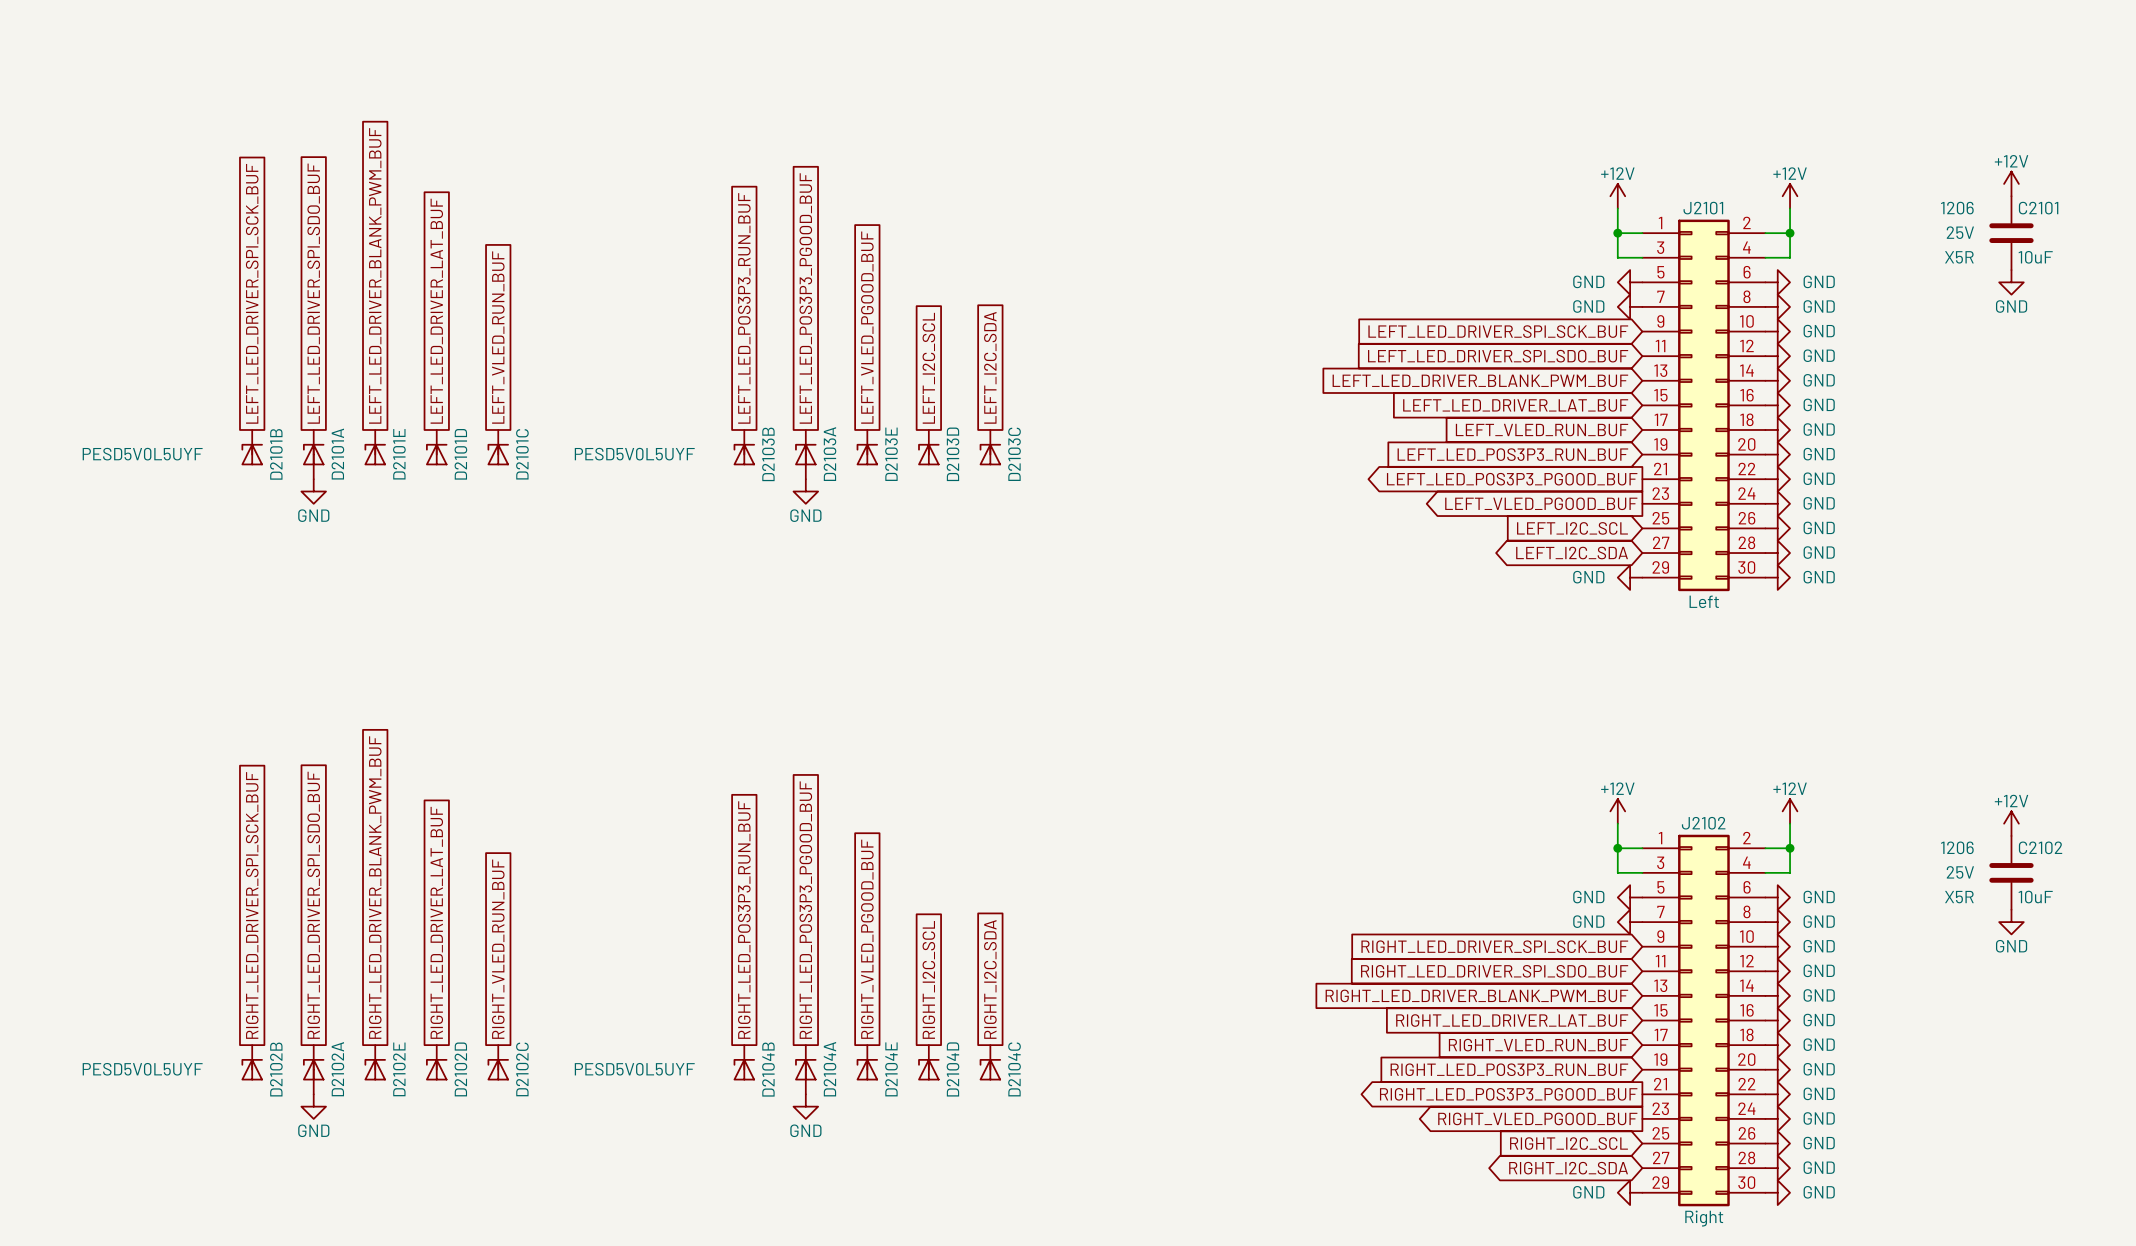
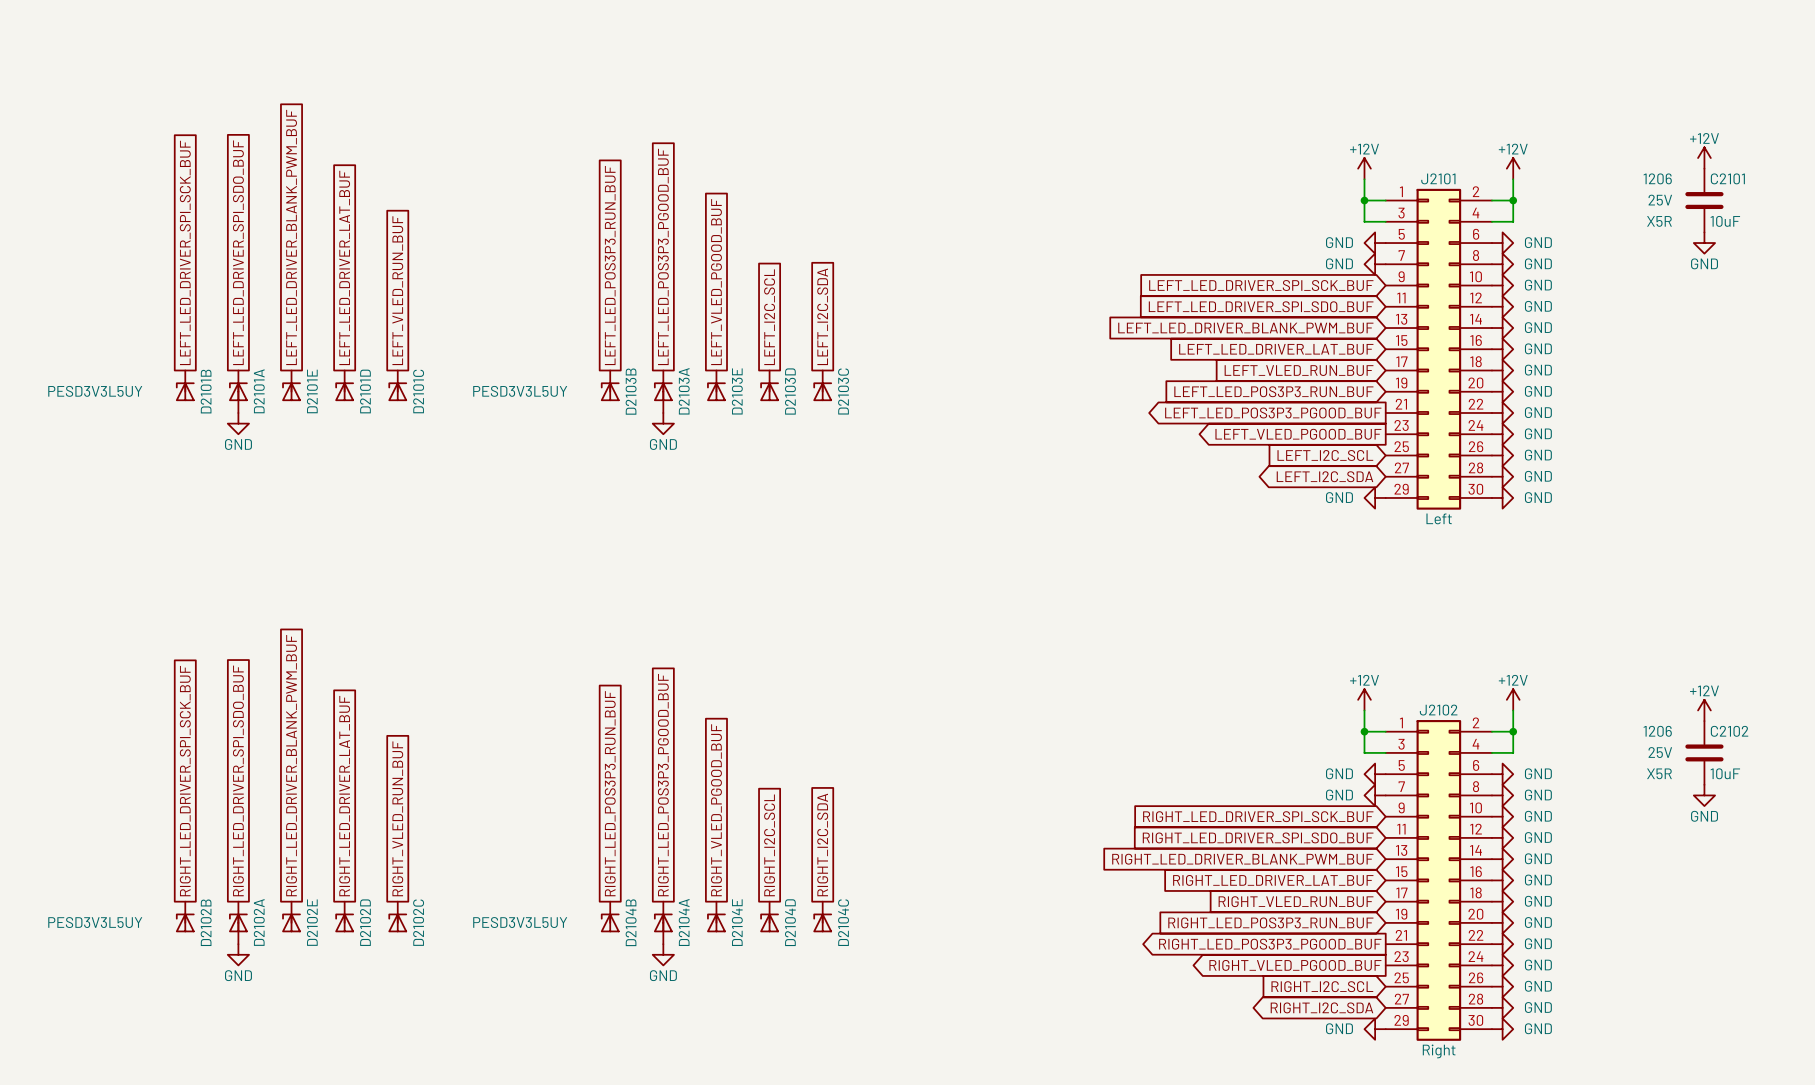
D2101A value: PESD5V0L5UYF (142, 454) -> PESD3V3L5UY (95, 391)
D2103A value: PESD5V0L5UYF (634, 454) -> PESD3V3L5UY (520, 391)
D2102A value: PESD5V0L5UYF (142, 1069) -> PESD3V3L5UY (95, 922)
D2104A value: PESD5V0L5UYF (634, 1069) -> PESD3V3L5UY (520, 922)

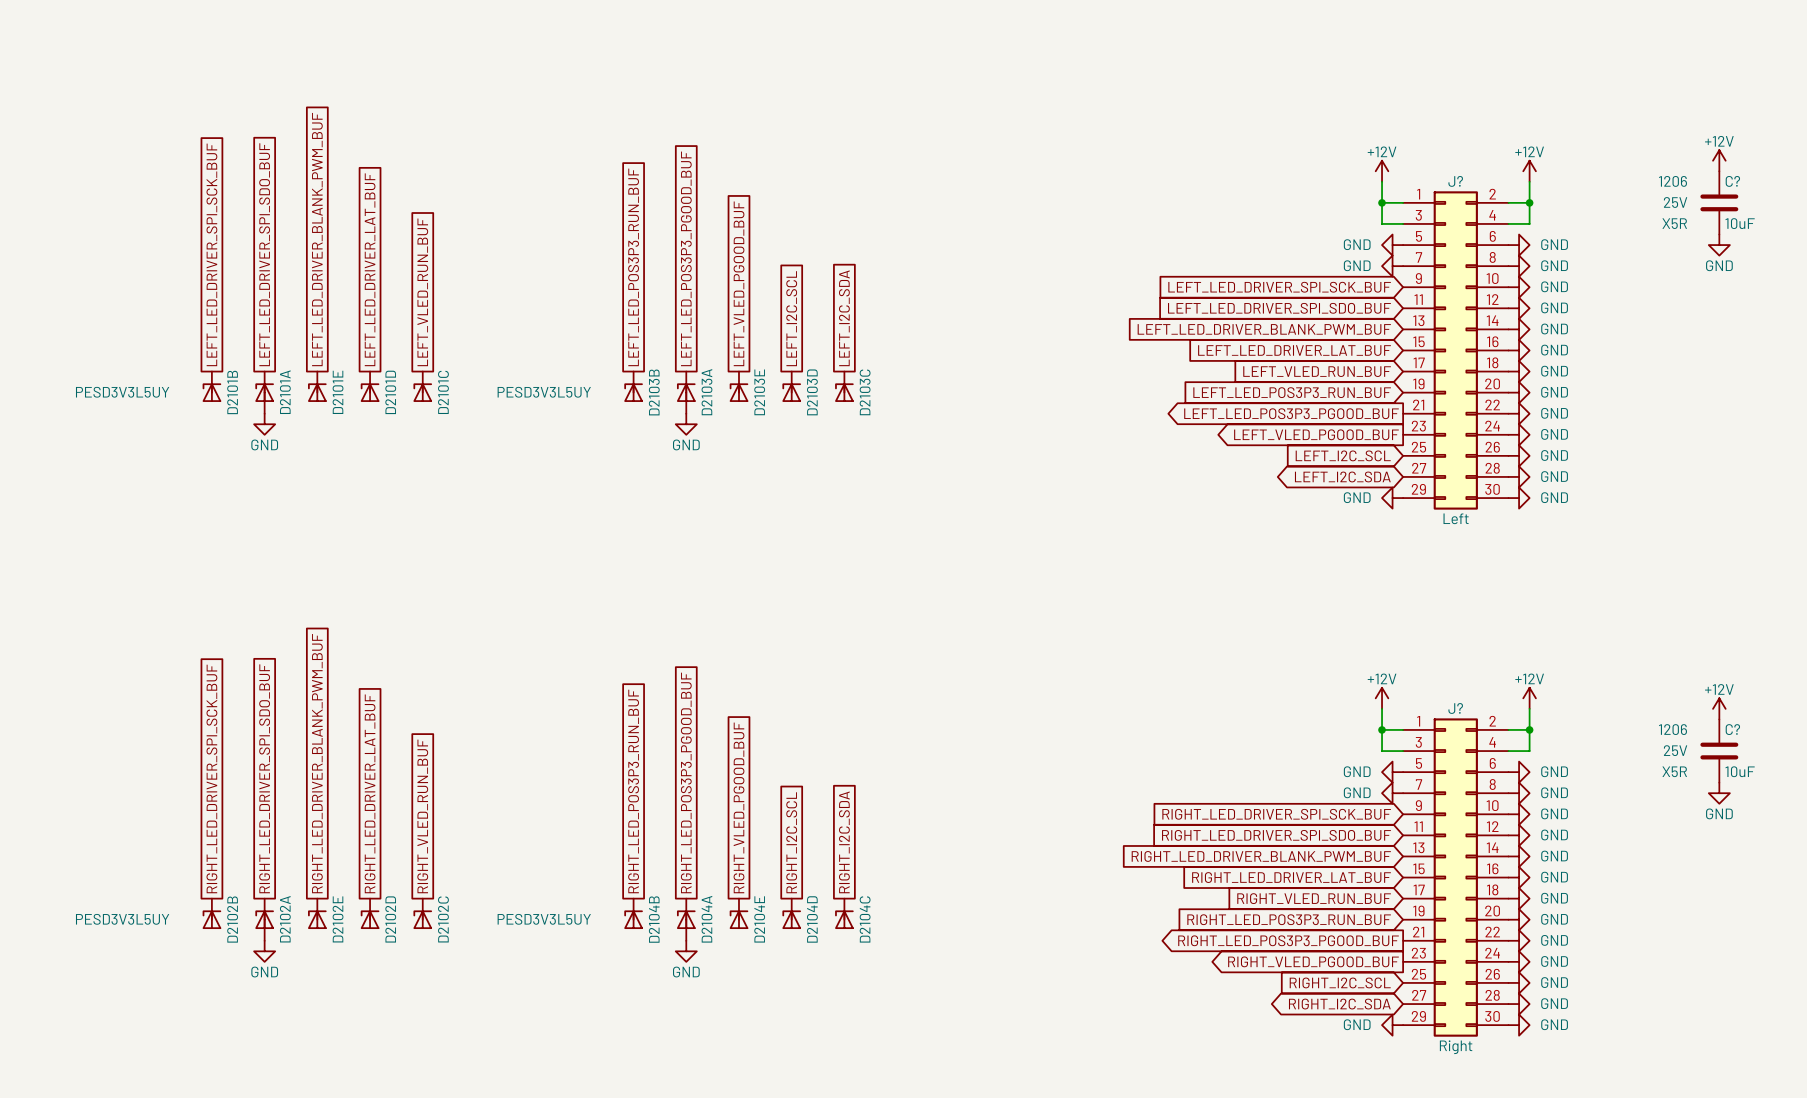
J2101 name: J2101 (1438, 178) -> J? (1455, 181)
C2101 name: C2101 (1727, 178) -> C? (1732, 181)
J2102 name: J2102 (1438, 710) -> J? (1455, 708)
C2102 name: C2102 (1729, 731) -> C? (1732, 729)

